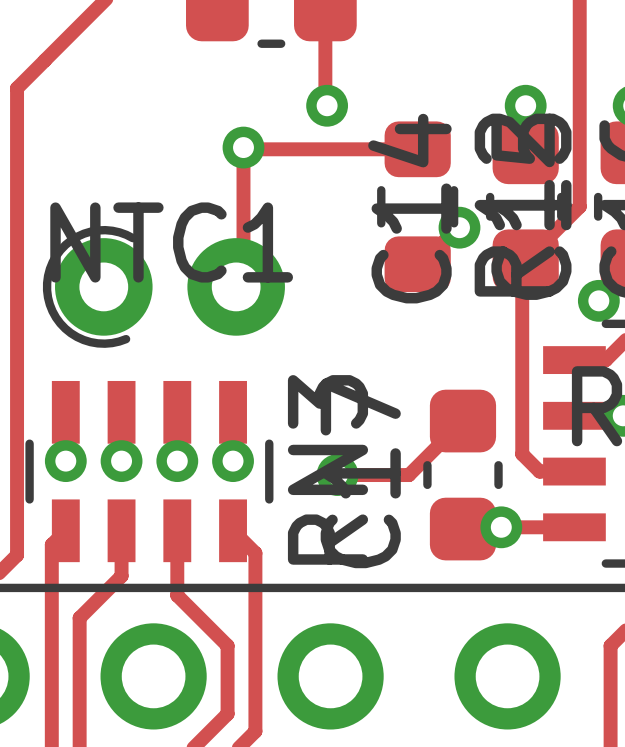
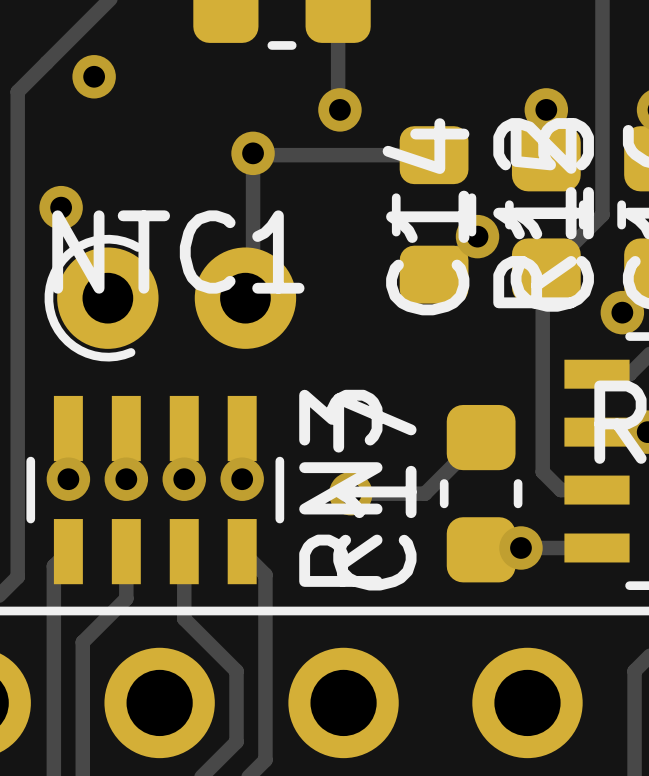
via: none -> (94, 76)
via: none -> (61, 207)

